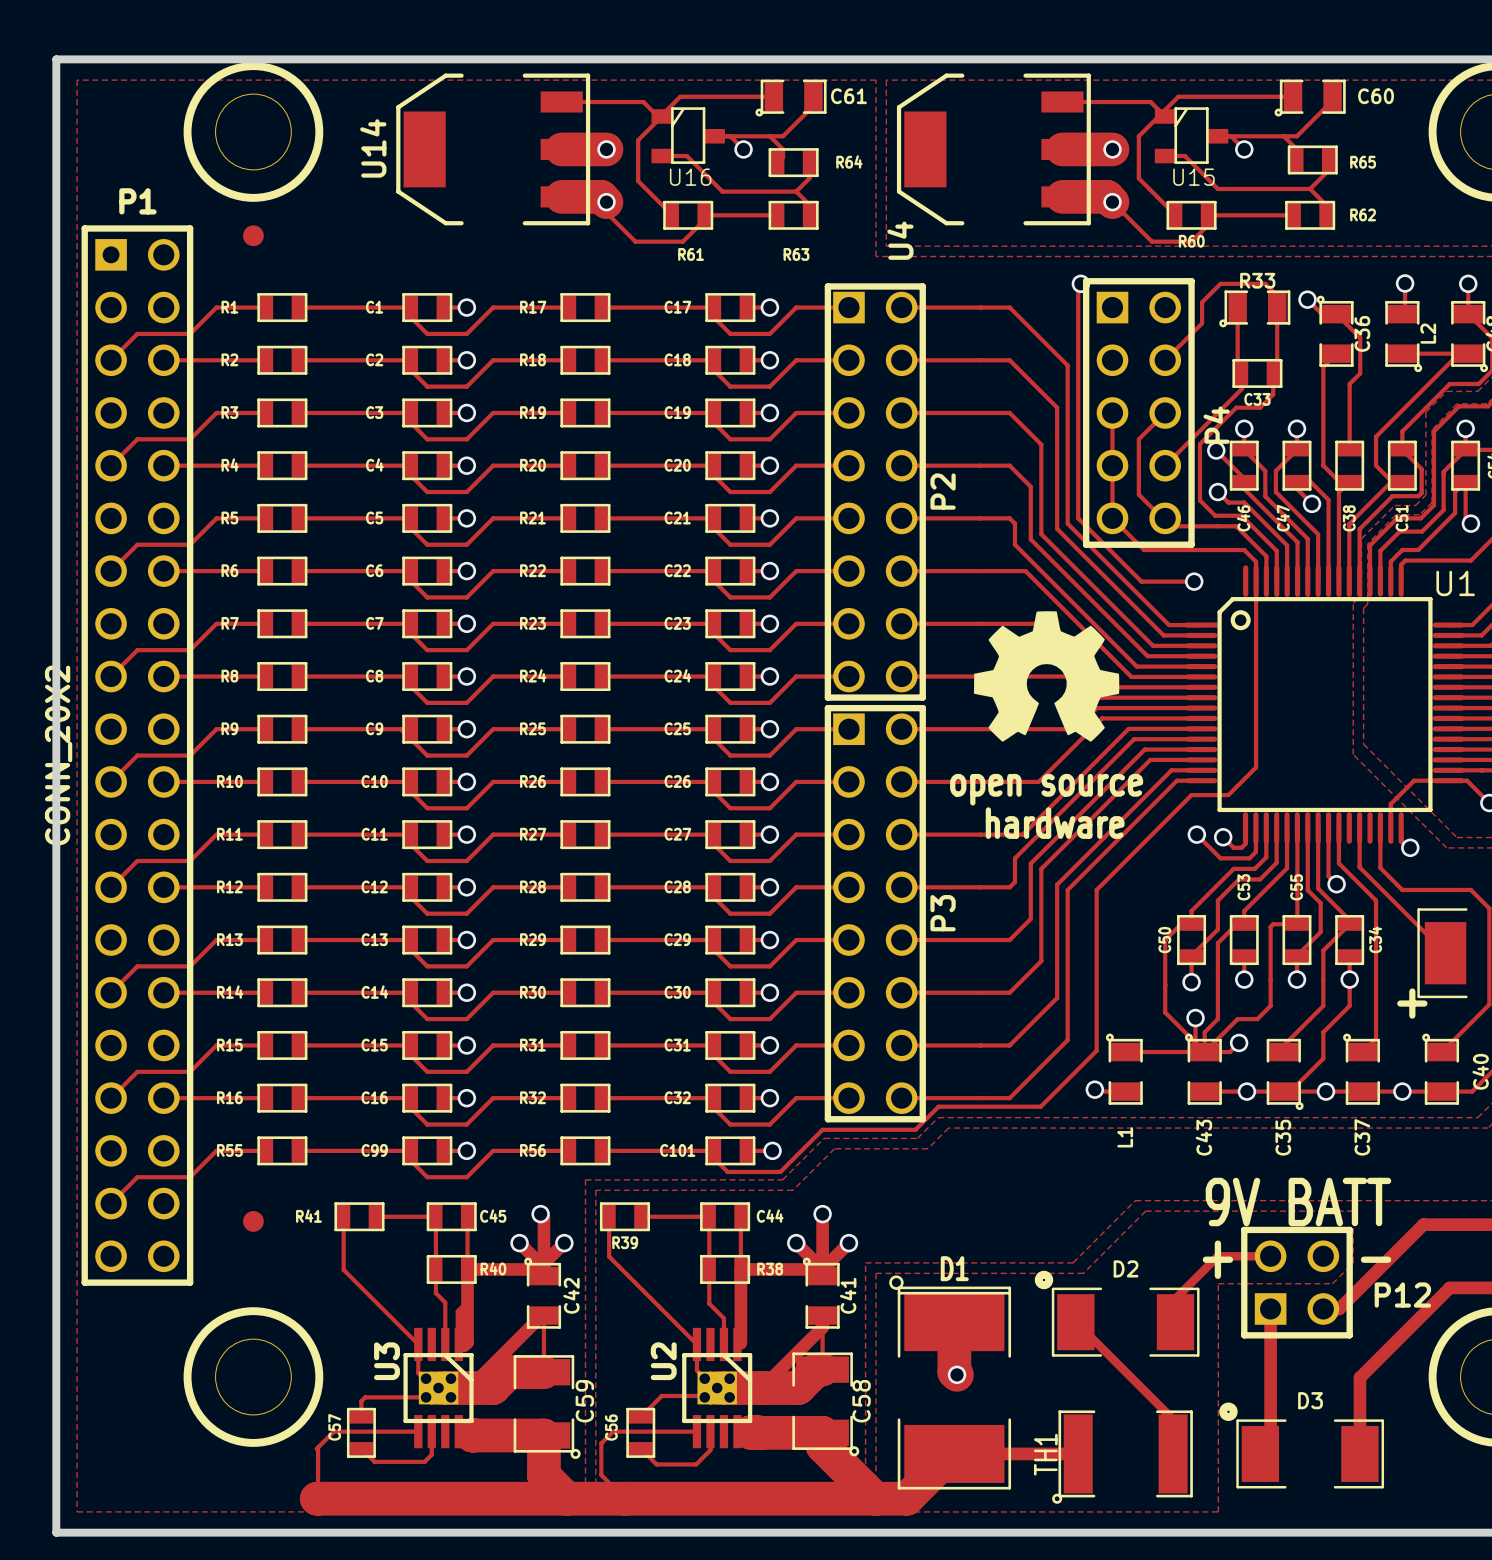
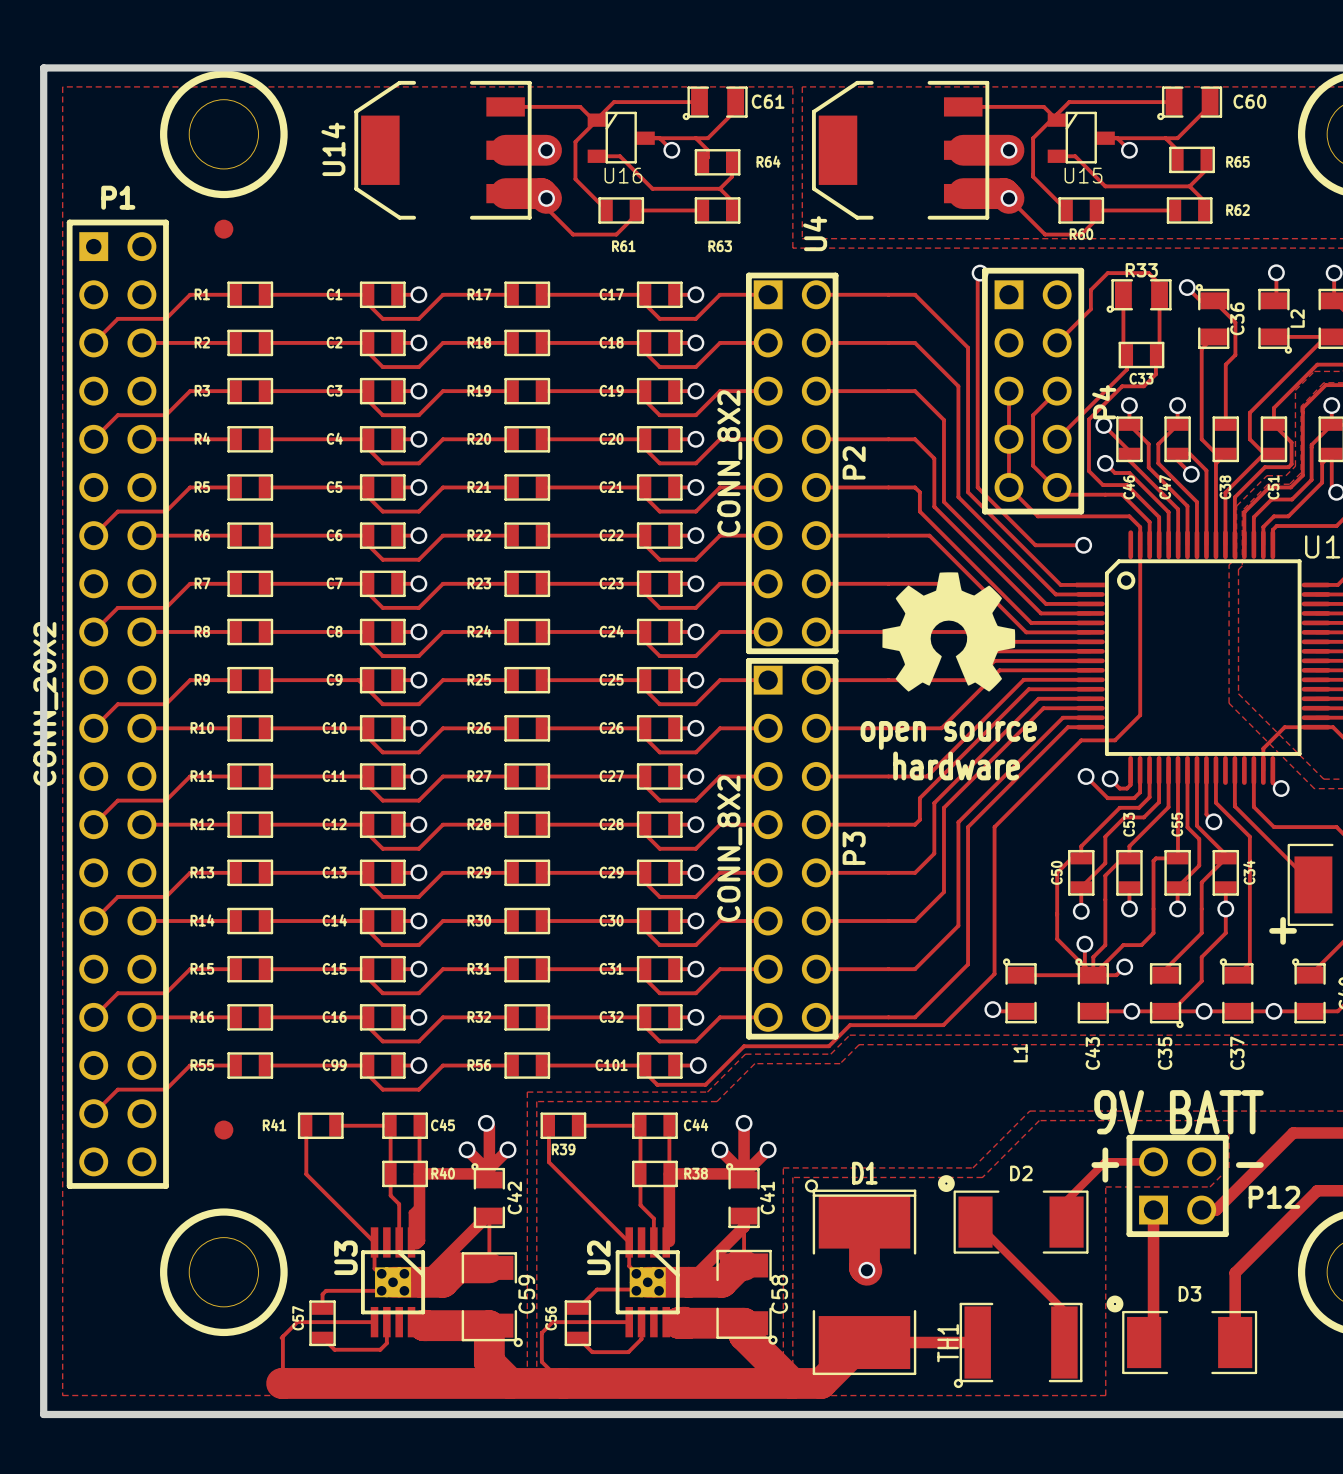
P2 value: none -> CONN_8X2 (729, 463)
P3 value: none -> CONN_8X2 (729, 848)

